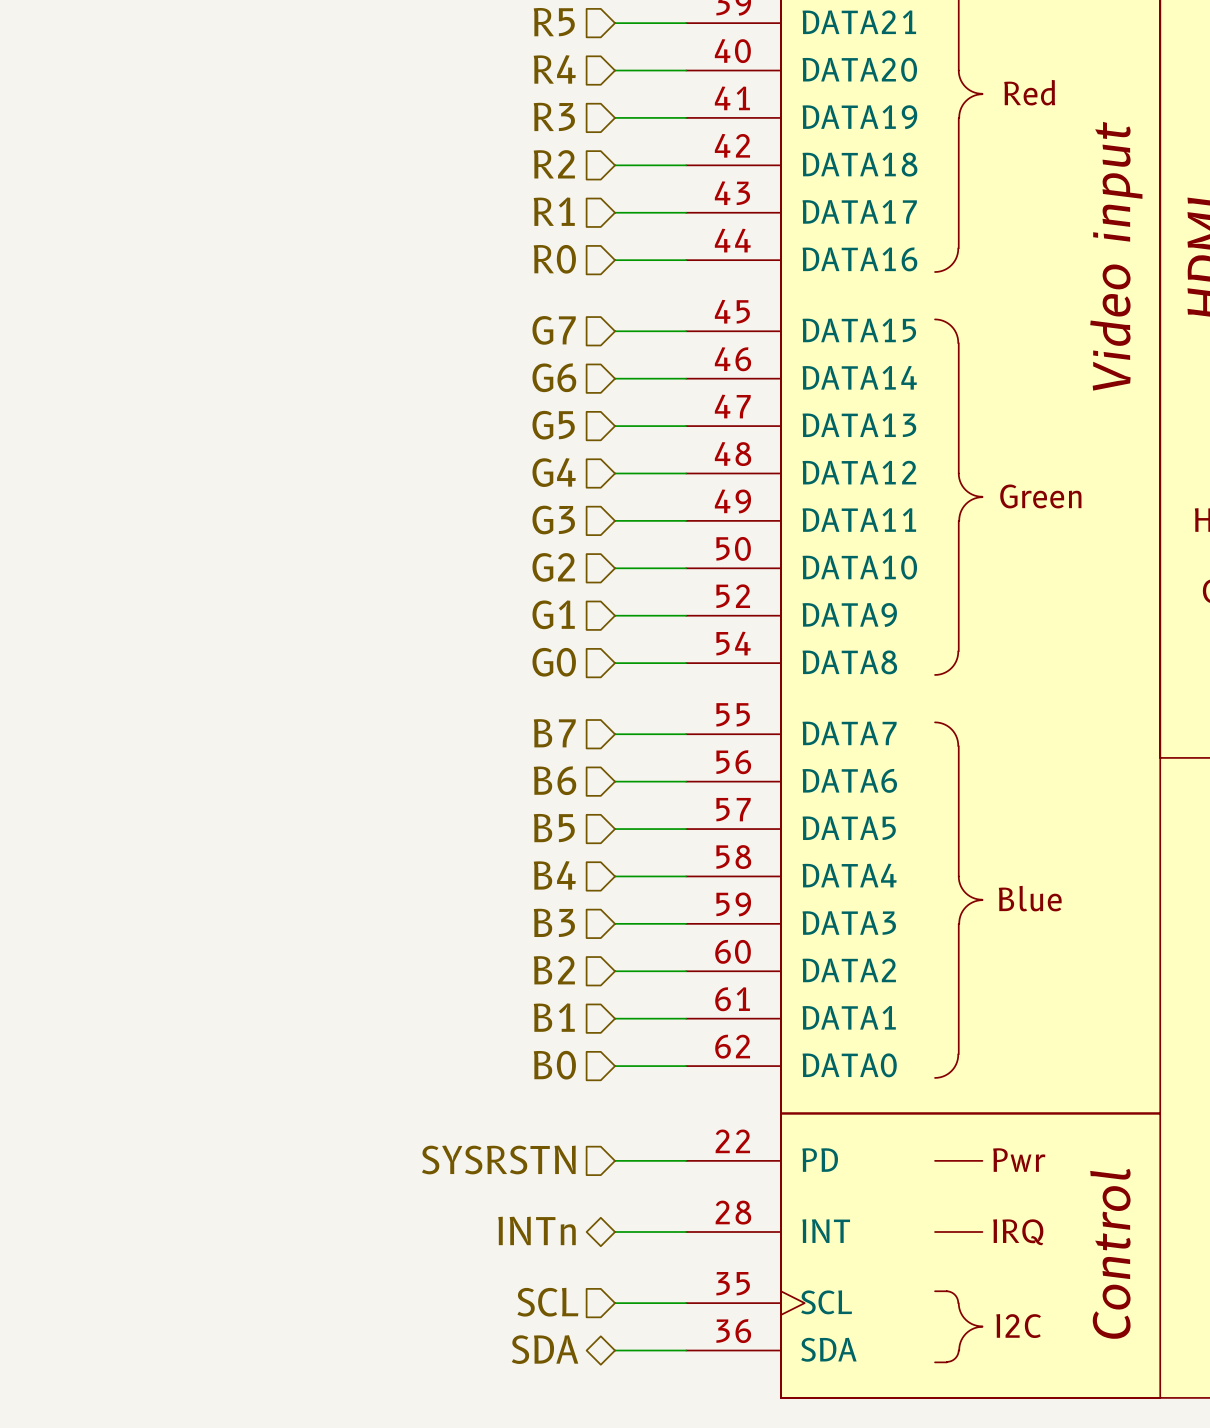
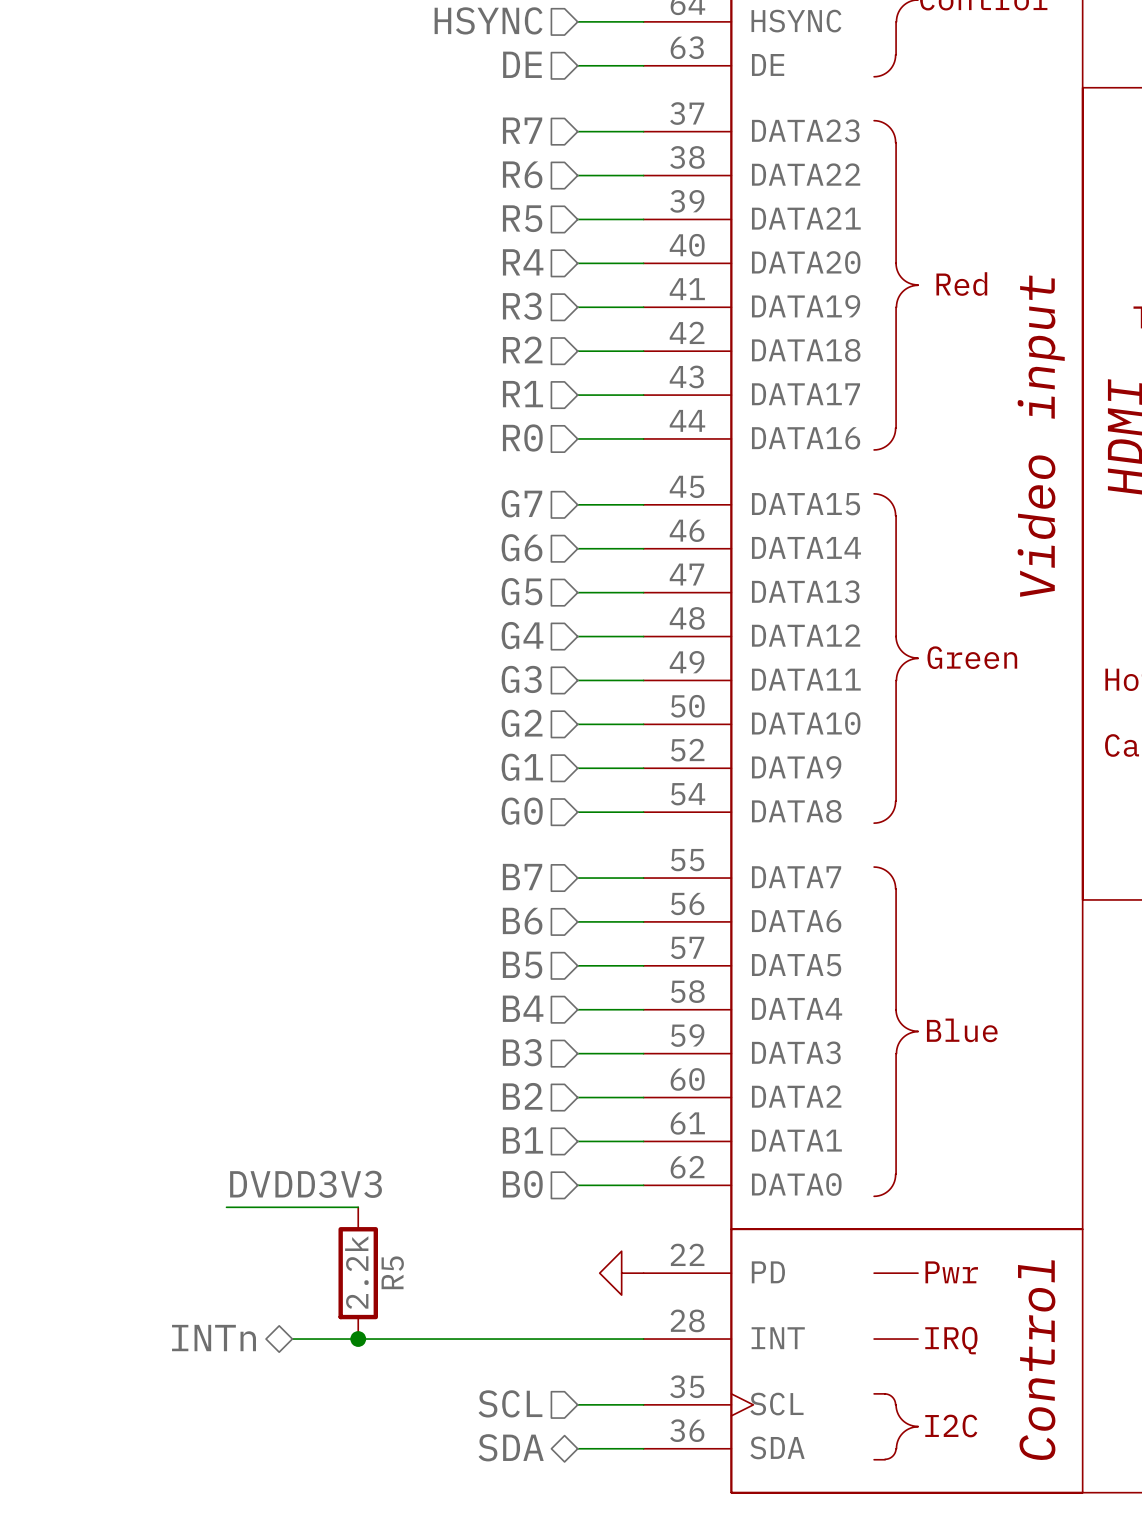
label: none -> DVDD3V3 (306, 1184)
wire: none -> (226, 1207) (358, 1207)
hierarchical label: SYSRSTN (498, 1159) -> none
R5: none -> 2.2k (358, 1273)
wire: (615, 1160) (686, 1160) -> none
power symbol: none -> (621, 1273)
hierarchical label position: INTn (537, 1230) -> INTn (214, 1338)
wire: none -> (292, 1339) (577, 1339)
junction: none -> (358, 1339)

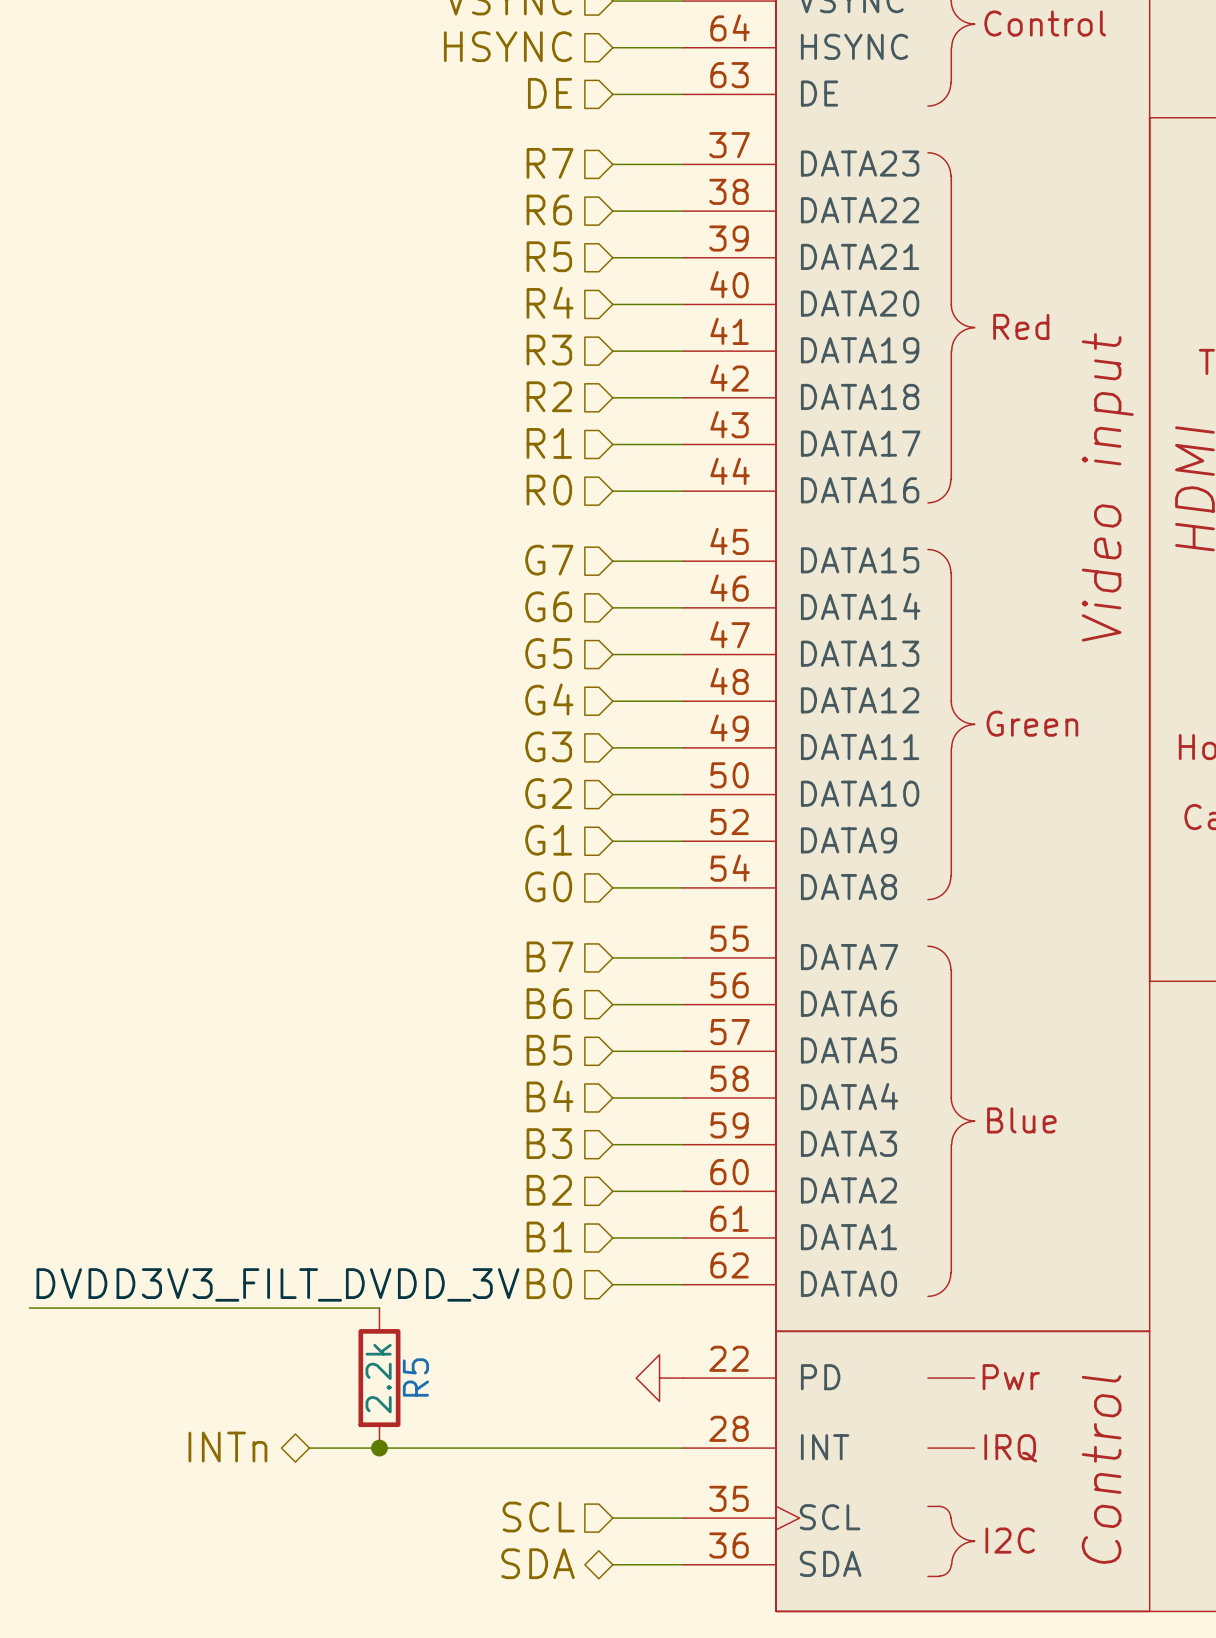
label: DVDD3V3 (306, 1184) -> none
label: none -> DVDD3V3_FILT_DVDD_3V (277, 1284)
wire: none -> (29, 1308) (239, 1308)

